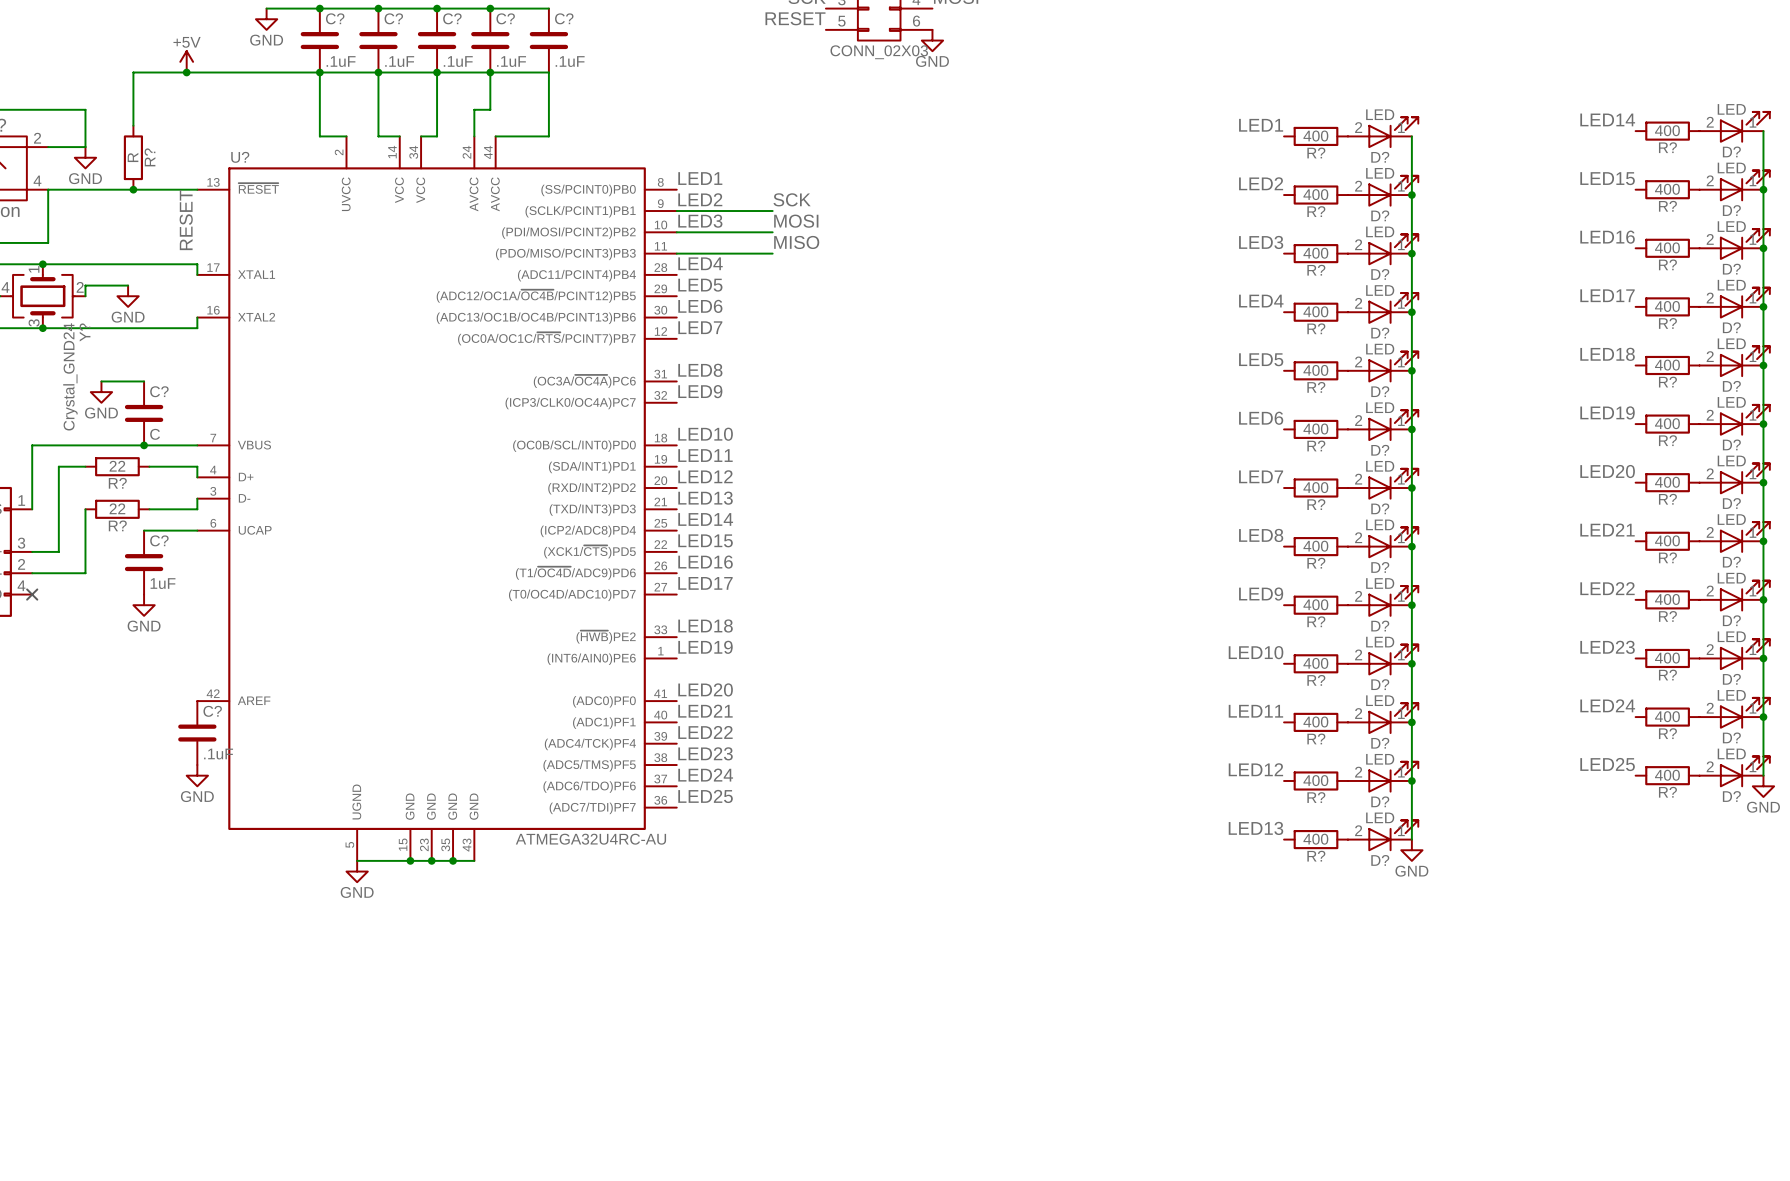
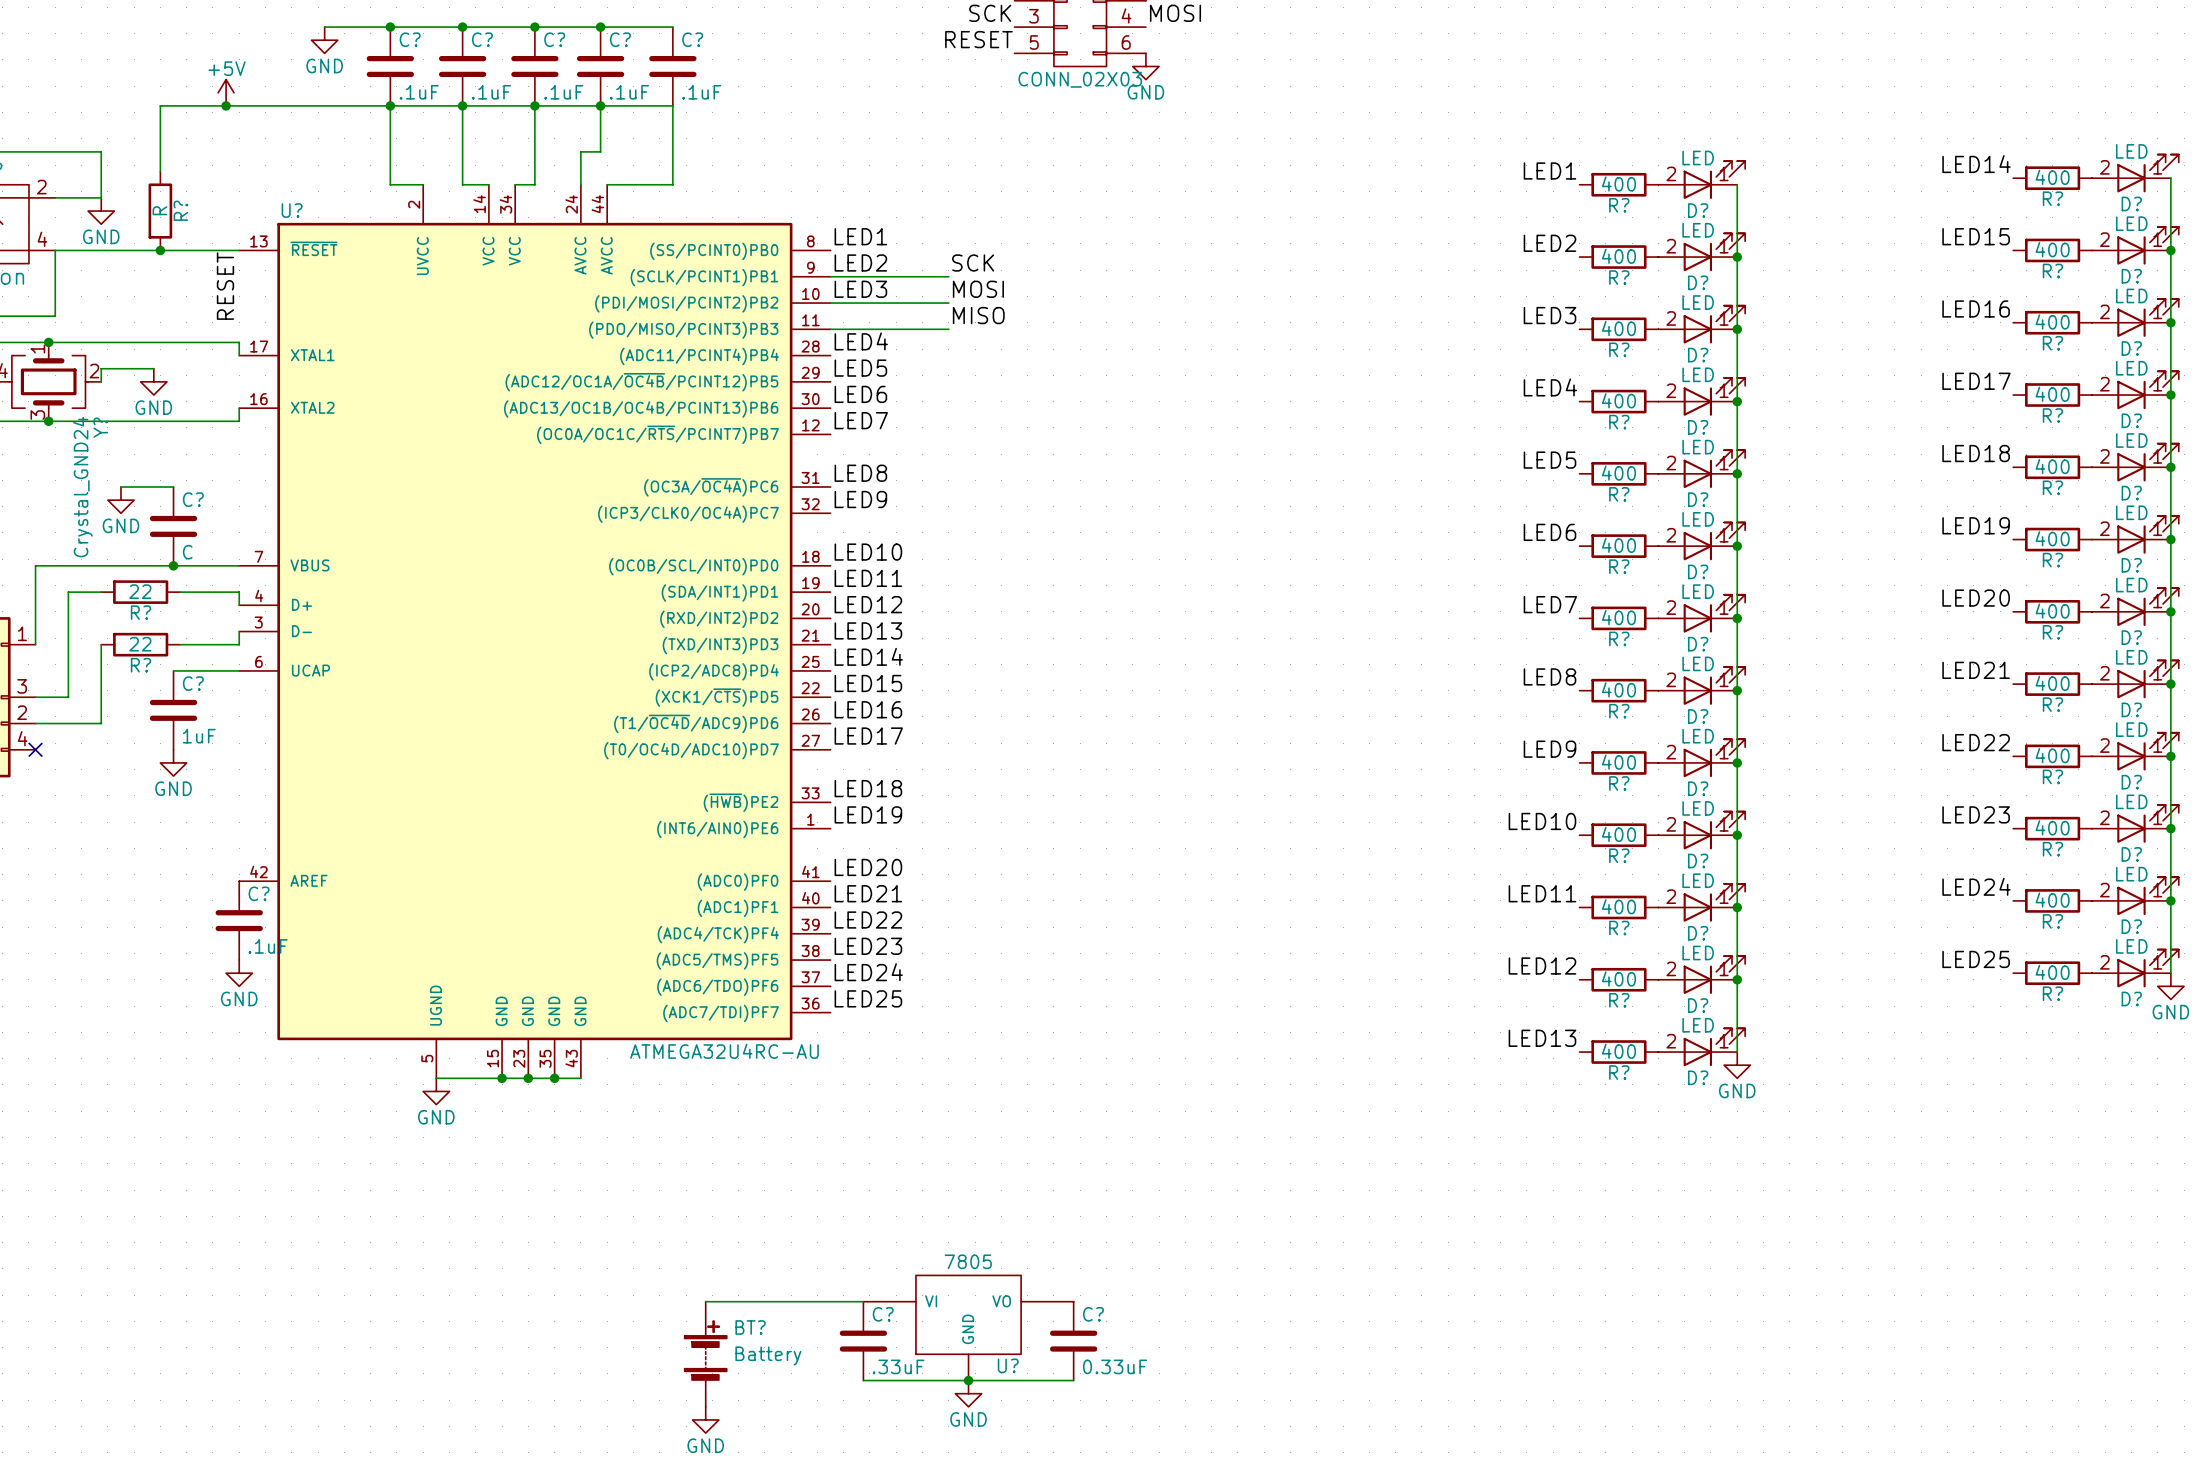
wire: none -> (705, 1301) (863, 1301)
U?: none -> 7805 (968, 1327)
C?: none -> .33uF (863, 1341)
C?: none -> 0.33uF (1073, 1341)
BT?: none -> Battery (705, 1354)
wire: none -> (863, 1380) (1073, 1380)
junction: none -> (968, 1380)
power symbol: none -> GND (968, 1393)
power symbol: none -> GND (705, 1419)

